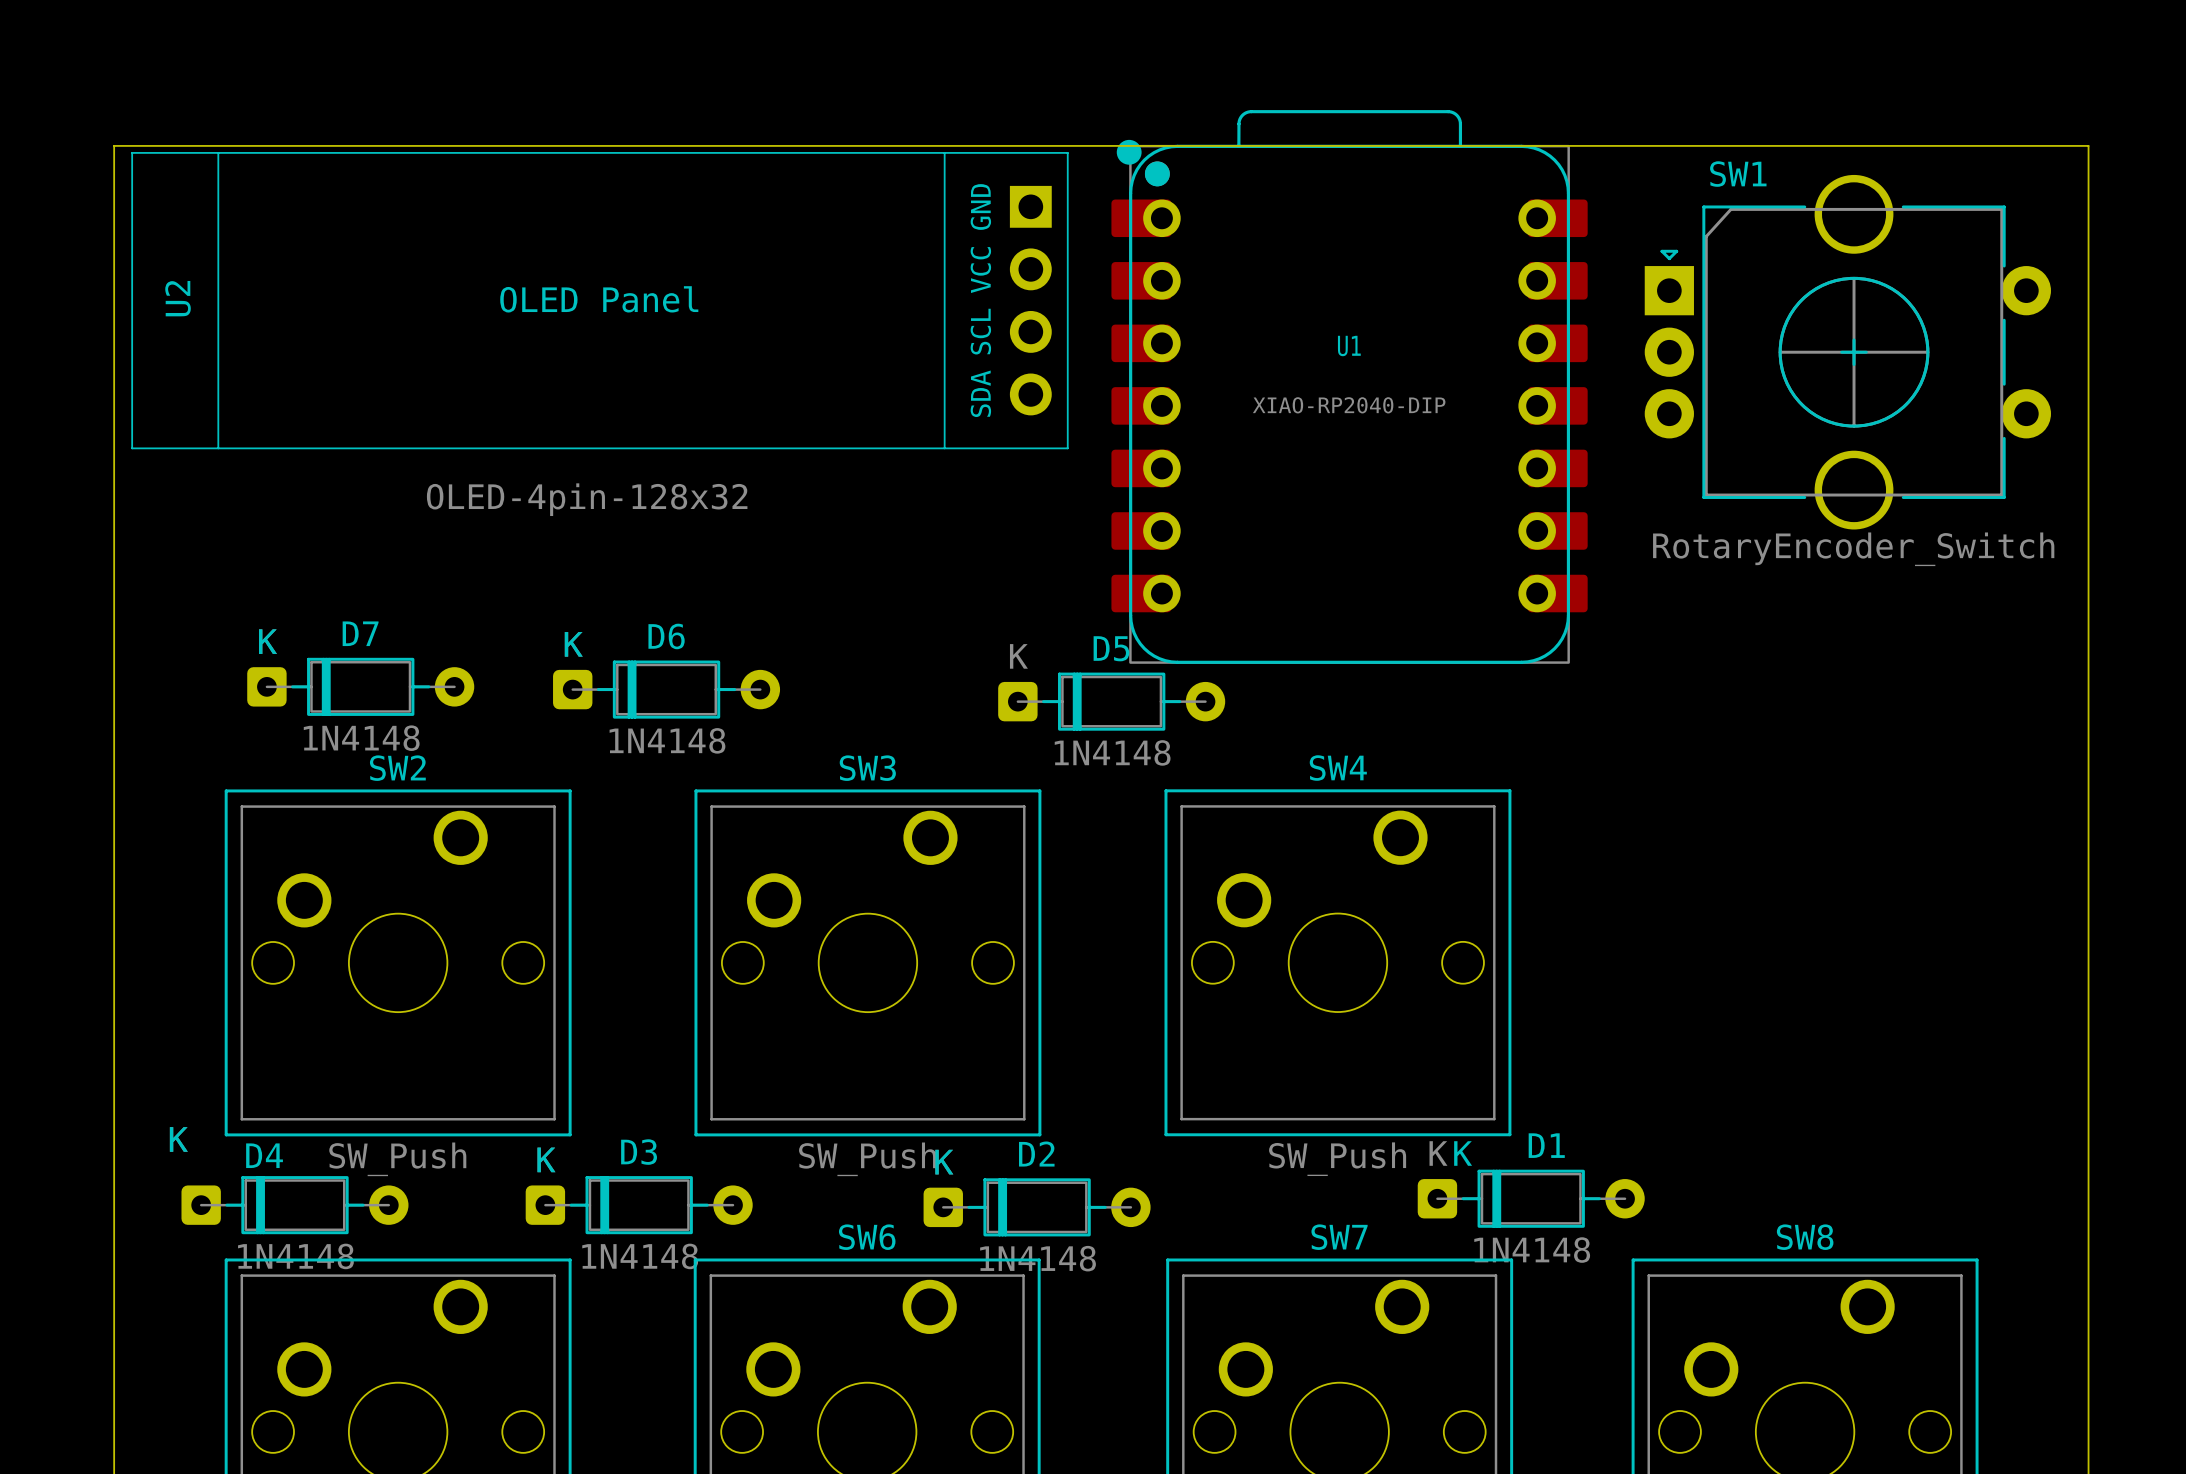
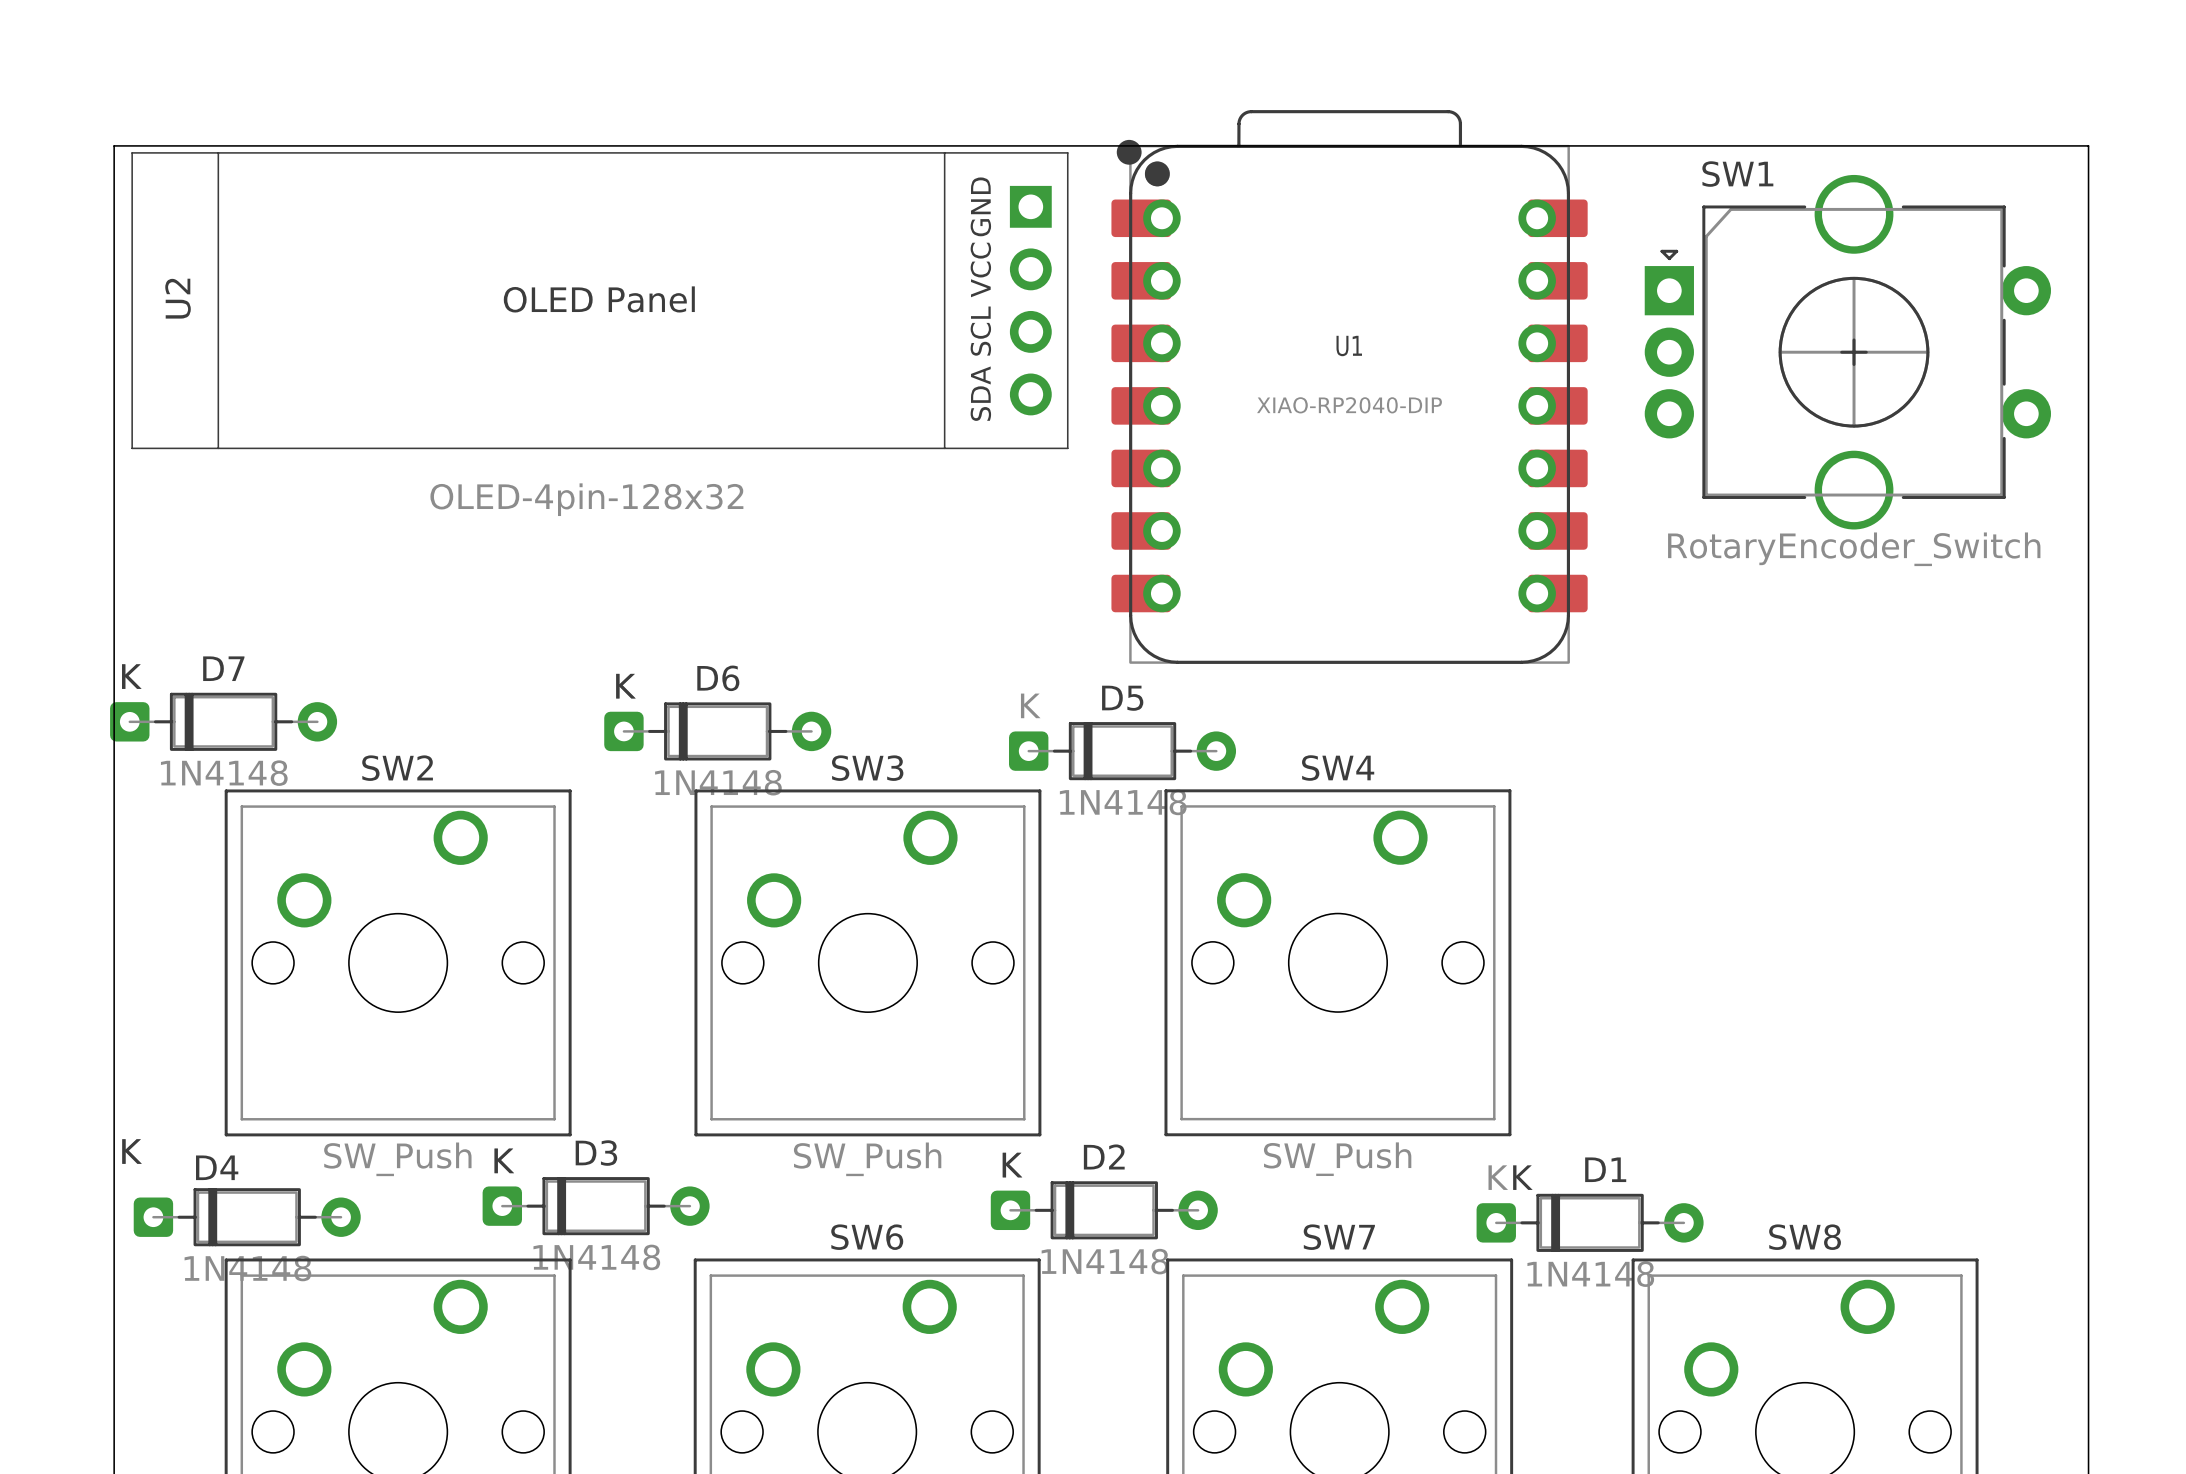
D7 position: (360, 686) -> (223, 721)
D6 position: (666, 689) -> (717, 731)
D5 position: (1111, 701) -> (1122, 751)
D1 position: (1531, 1198) -> (1590, 1222)
D4 position: (294, 1205) -> (247, 1217)
D3 position: (639, 1205) -> (596, 1206)
D2 position: (1037, 1207) -> (1104, 1210)

